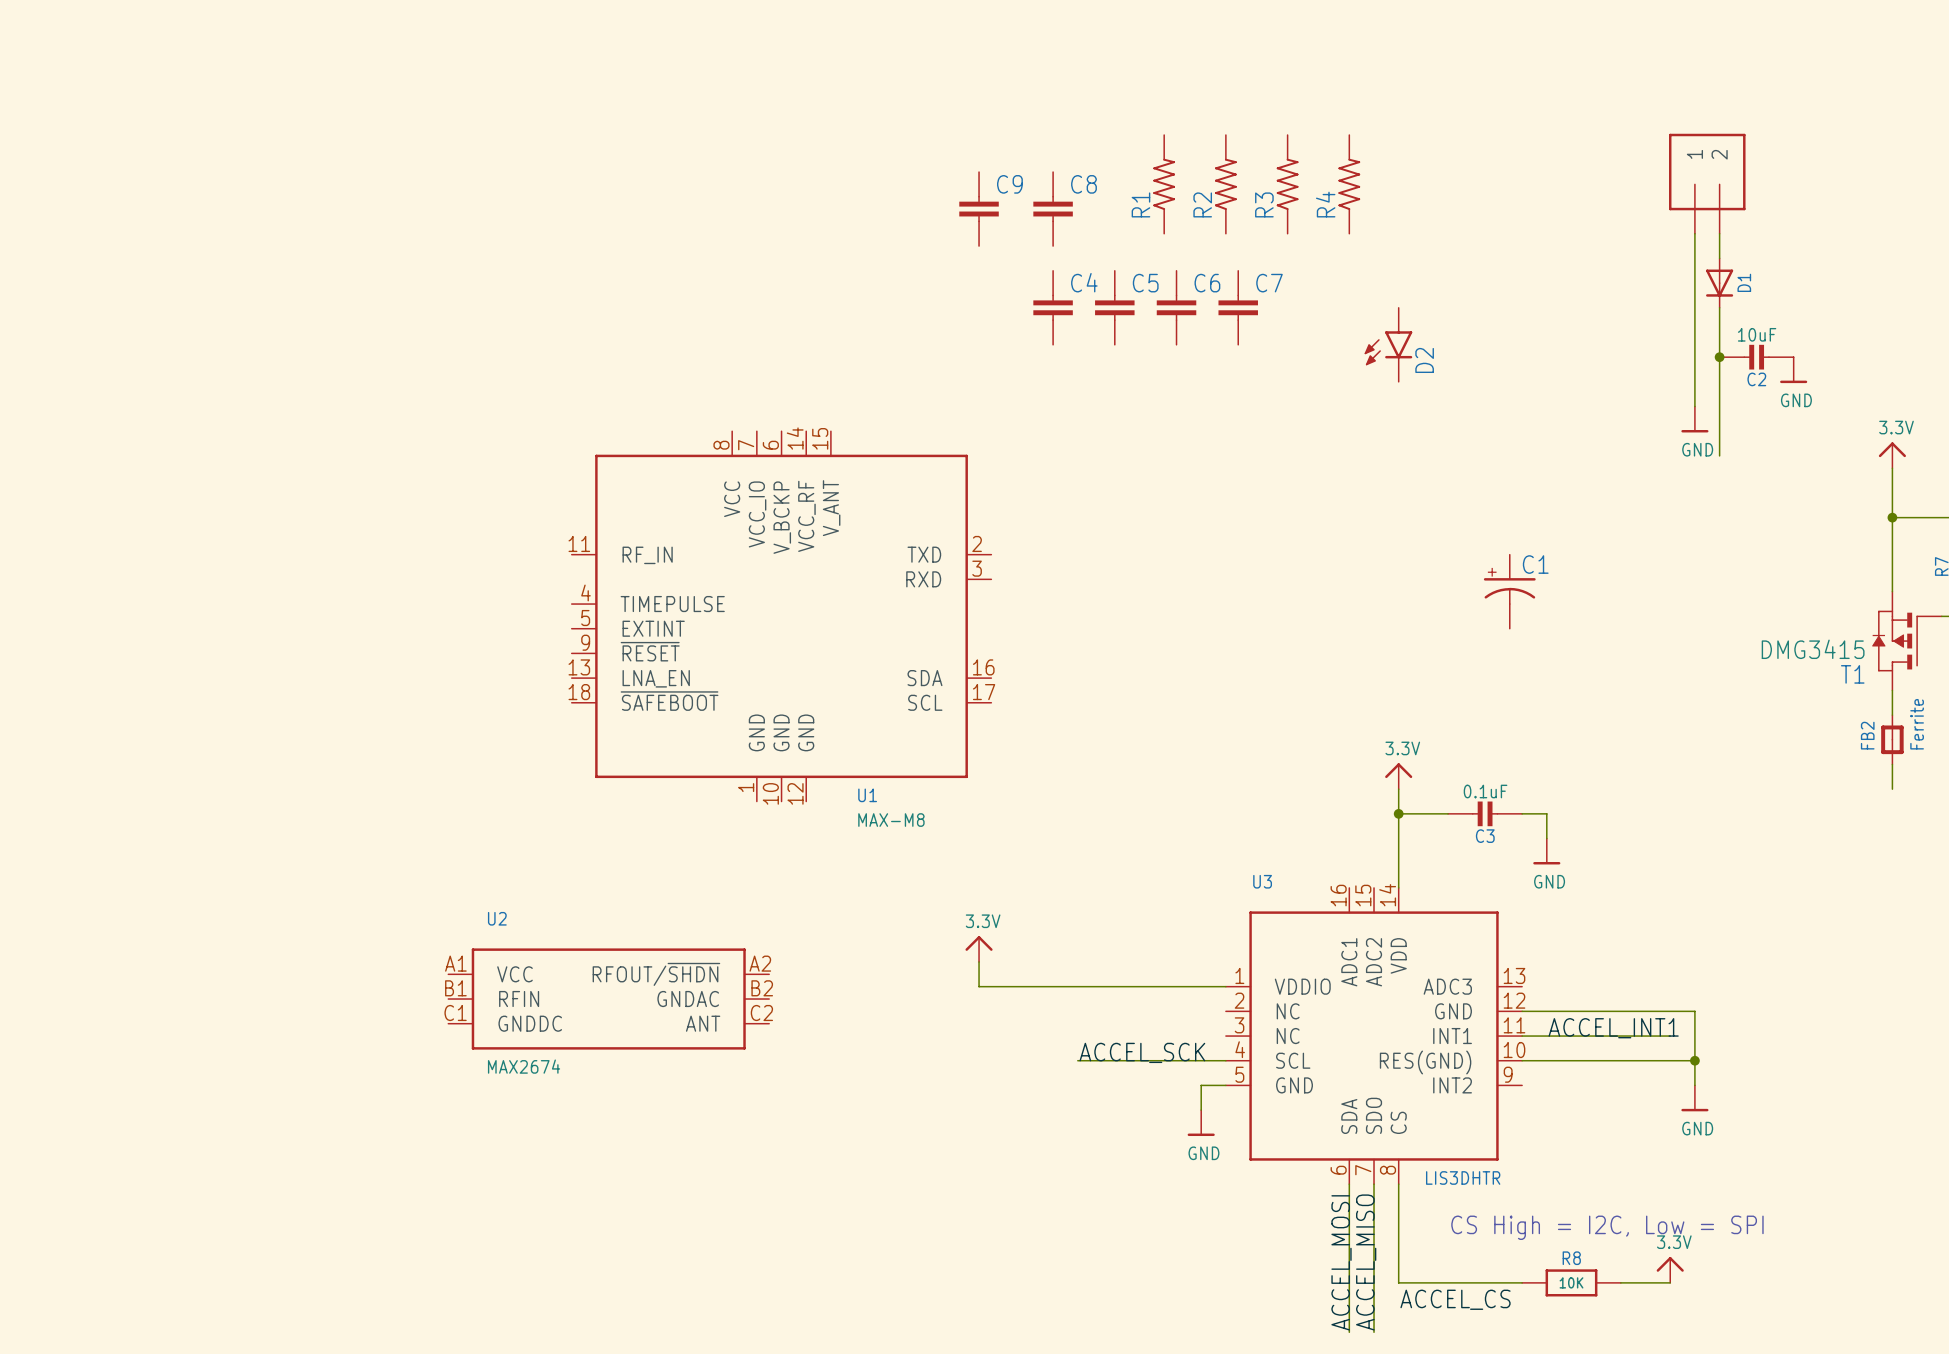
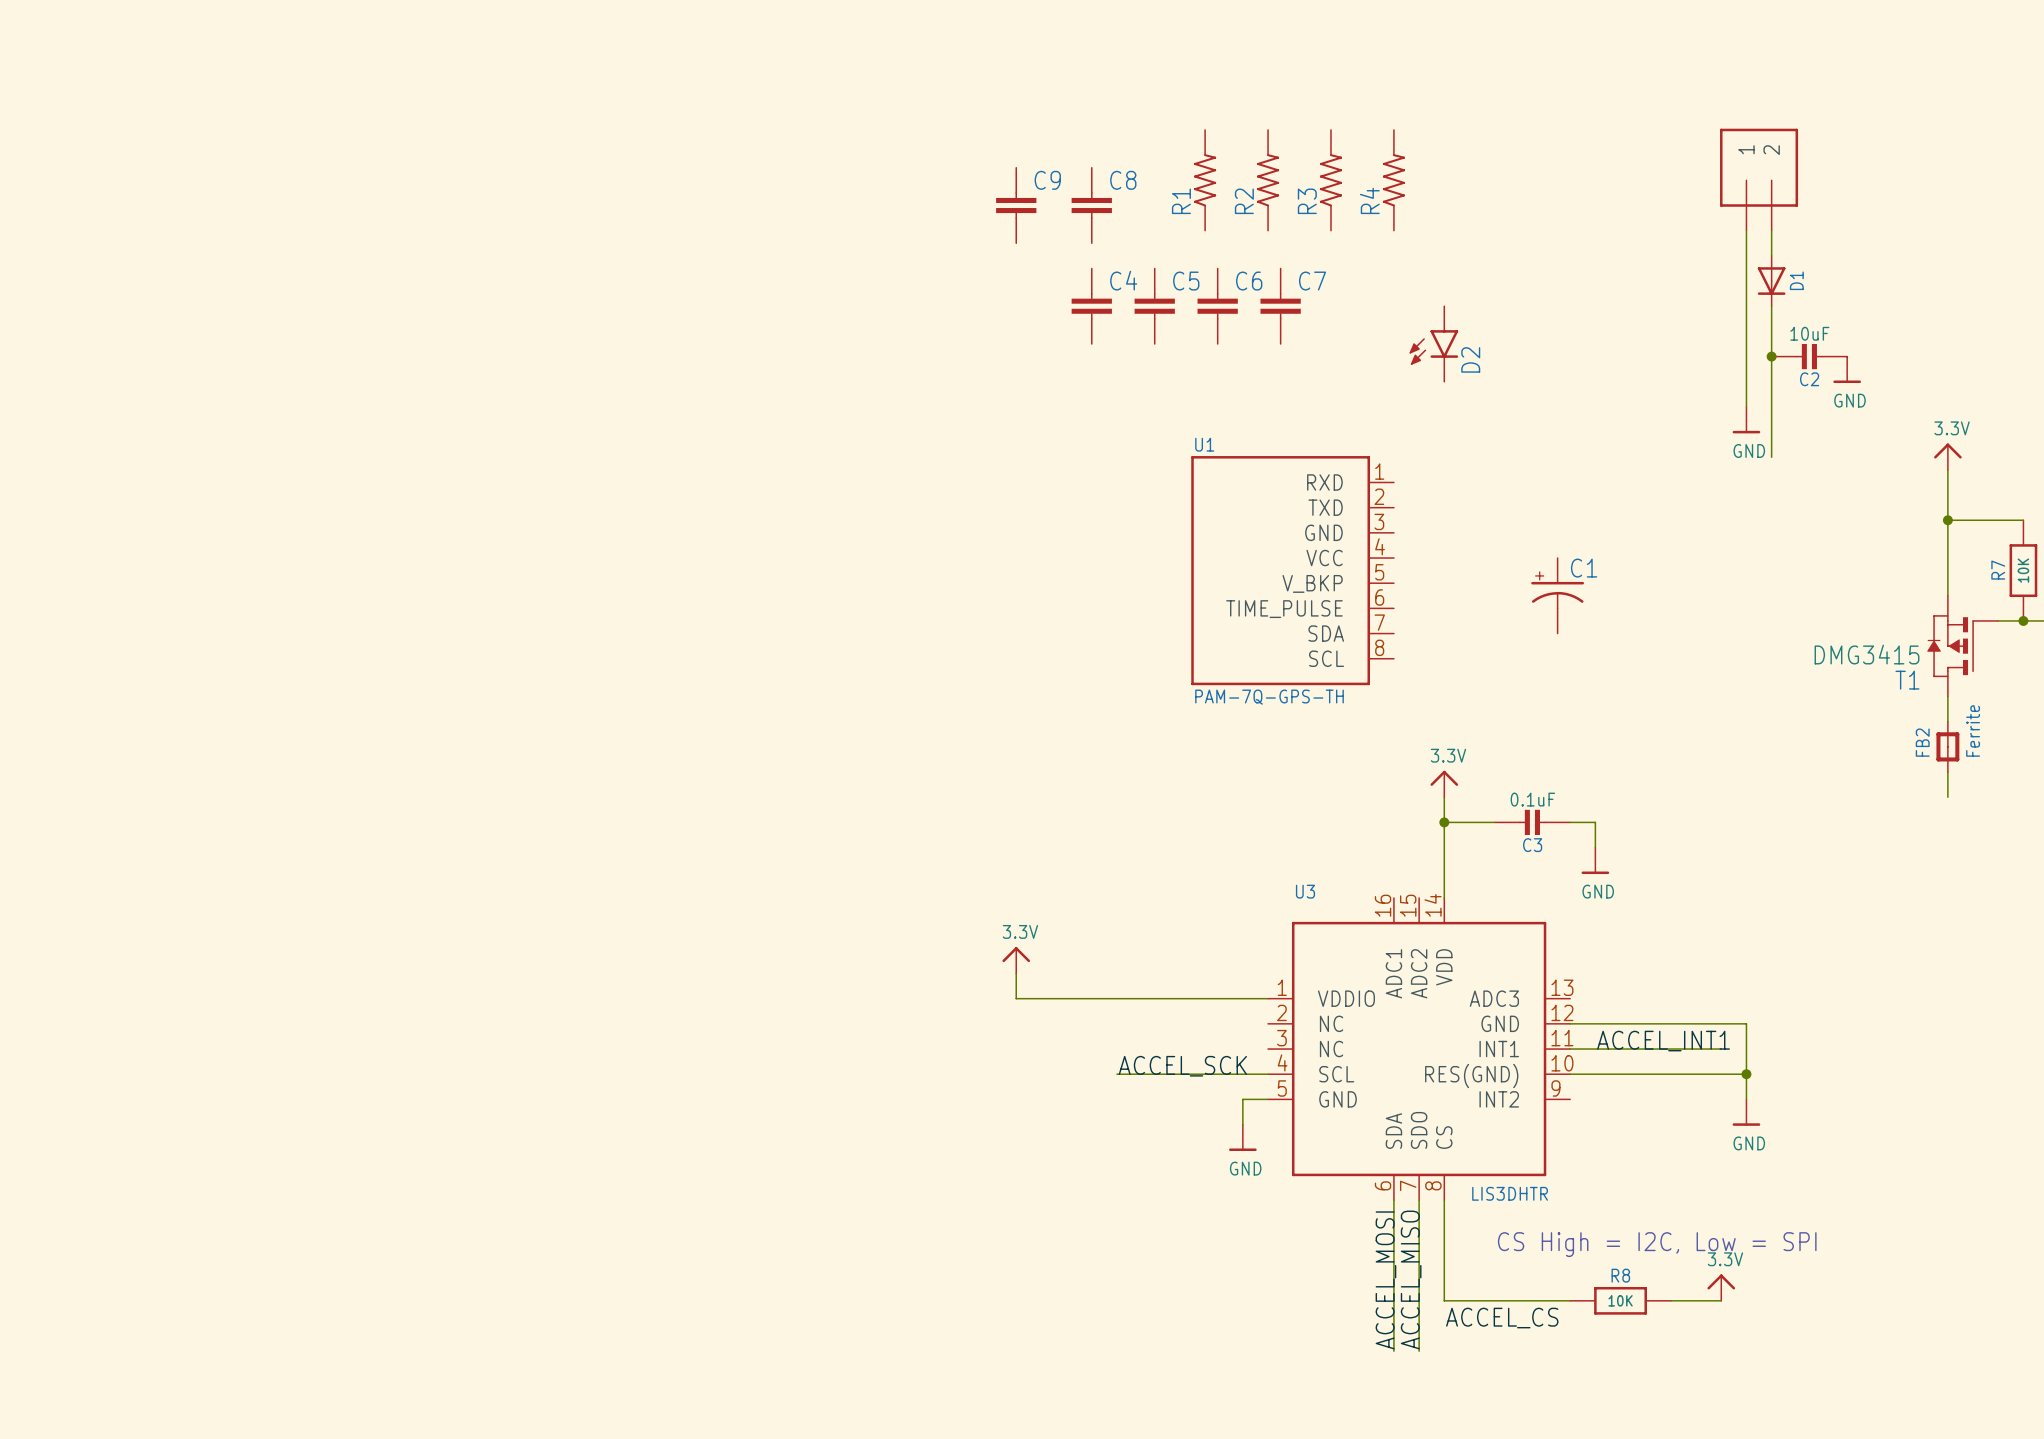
U1 symbol: [571, 431, 992, 802] -> [1191, 456, 1394, 686]
U1 name position: U1 (867, 795) -> U1 (1204, 444)
U1 value: MAX-M8 (891, 820) -> PAM-7Q-GPS-TH (1269, 697)
U2: MAX2674 (608, 999) -> none

